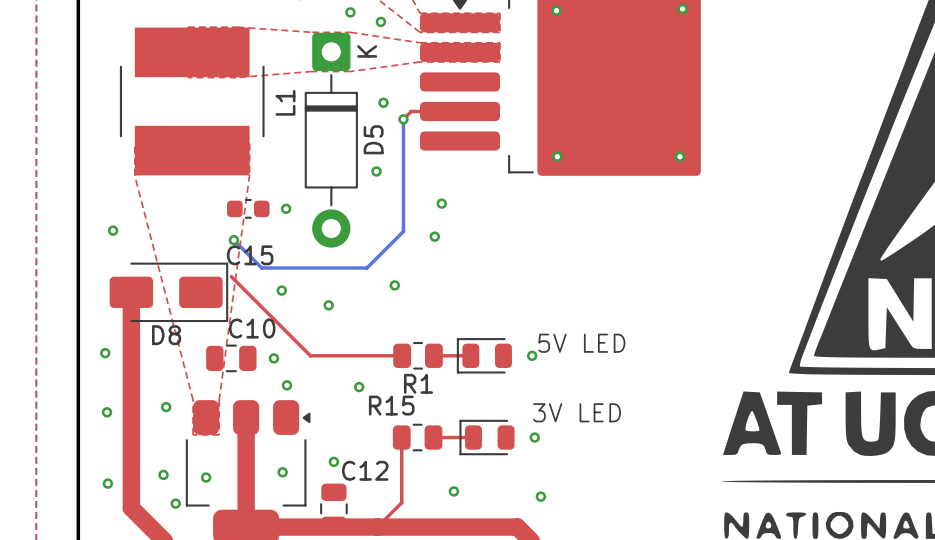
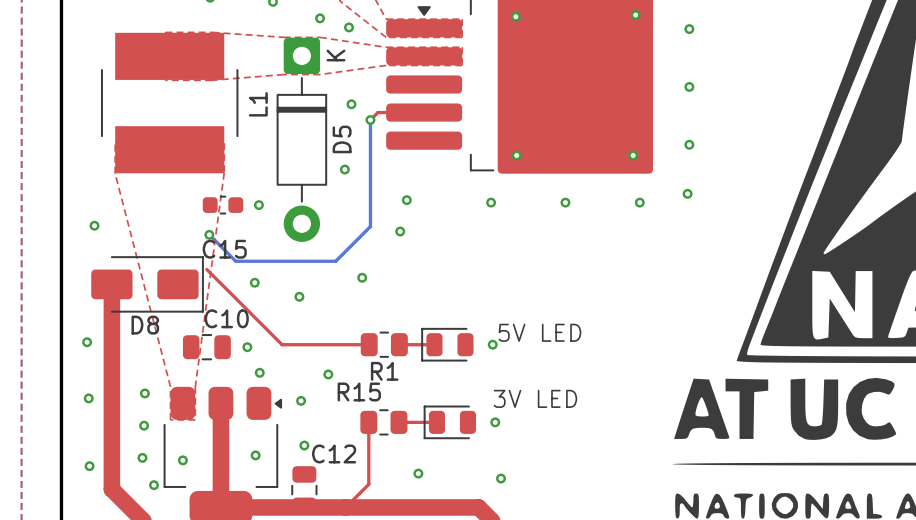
via: none -> (689, 29)
via: none -> (689, 86)
via: none -> (689, 144)
via: none -> (687, 193)
via: none -> (491, 202)
via: none -> (565, 202)
via: none -> (639, 202)
via: none -> (301, 400)
via: none -> (144, 425)

